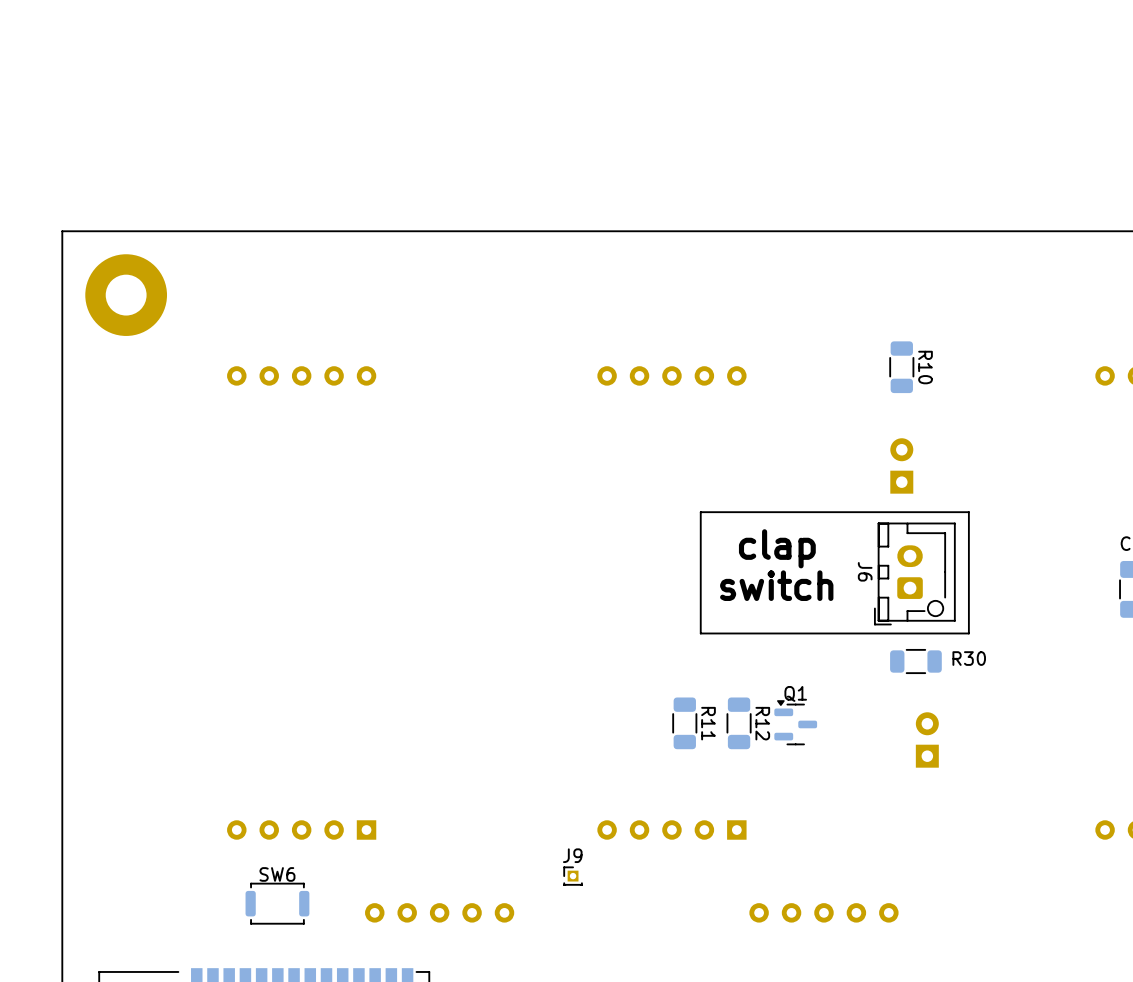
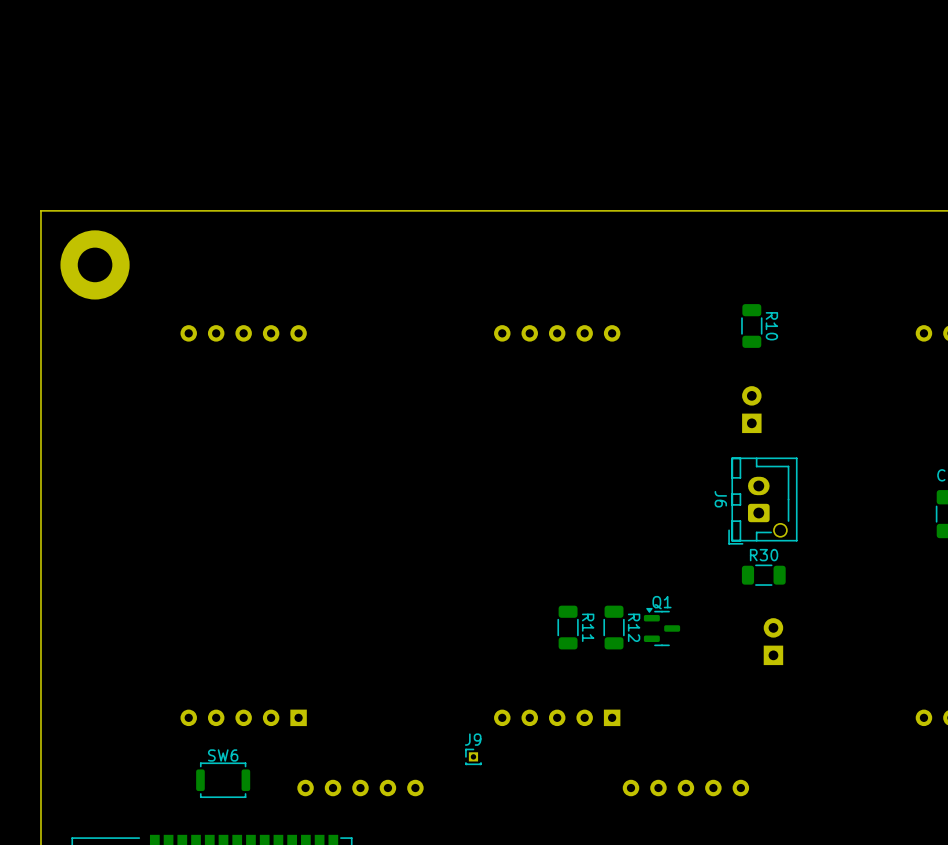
line: (968, 512) (700, 512) (700, 633) (968, 633) (968, 512) -> none
text: clap (777, 548) -> none
text: switch (776, 585) -> none
R30 name position: R30 (969, 658) -> R30 (764, 555)

